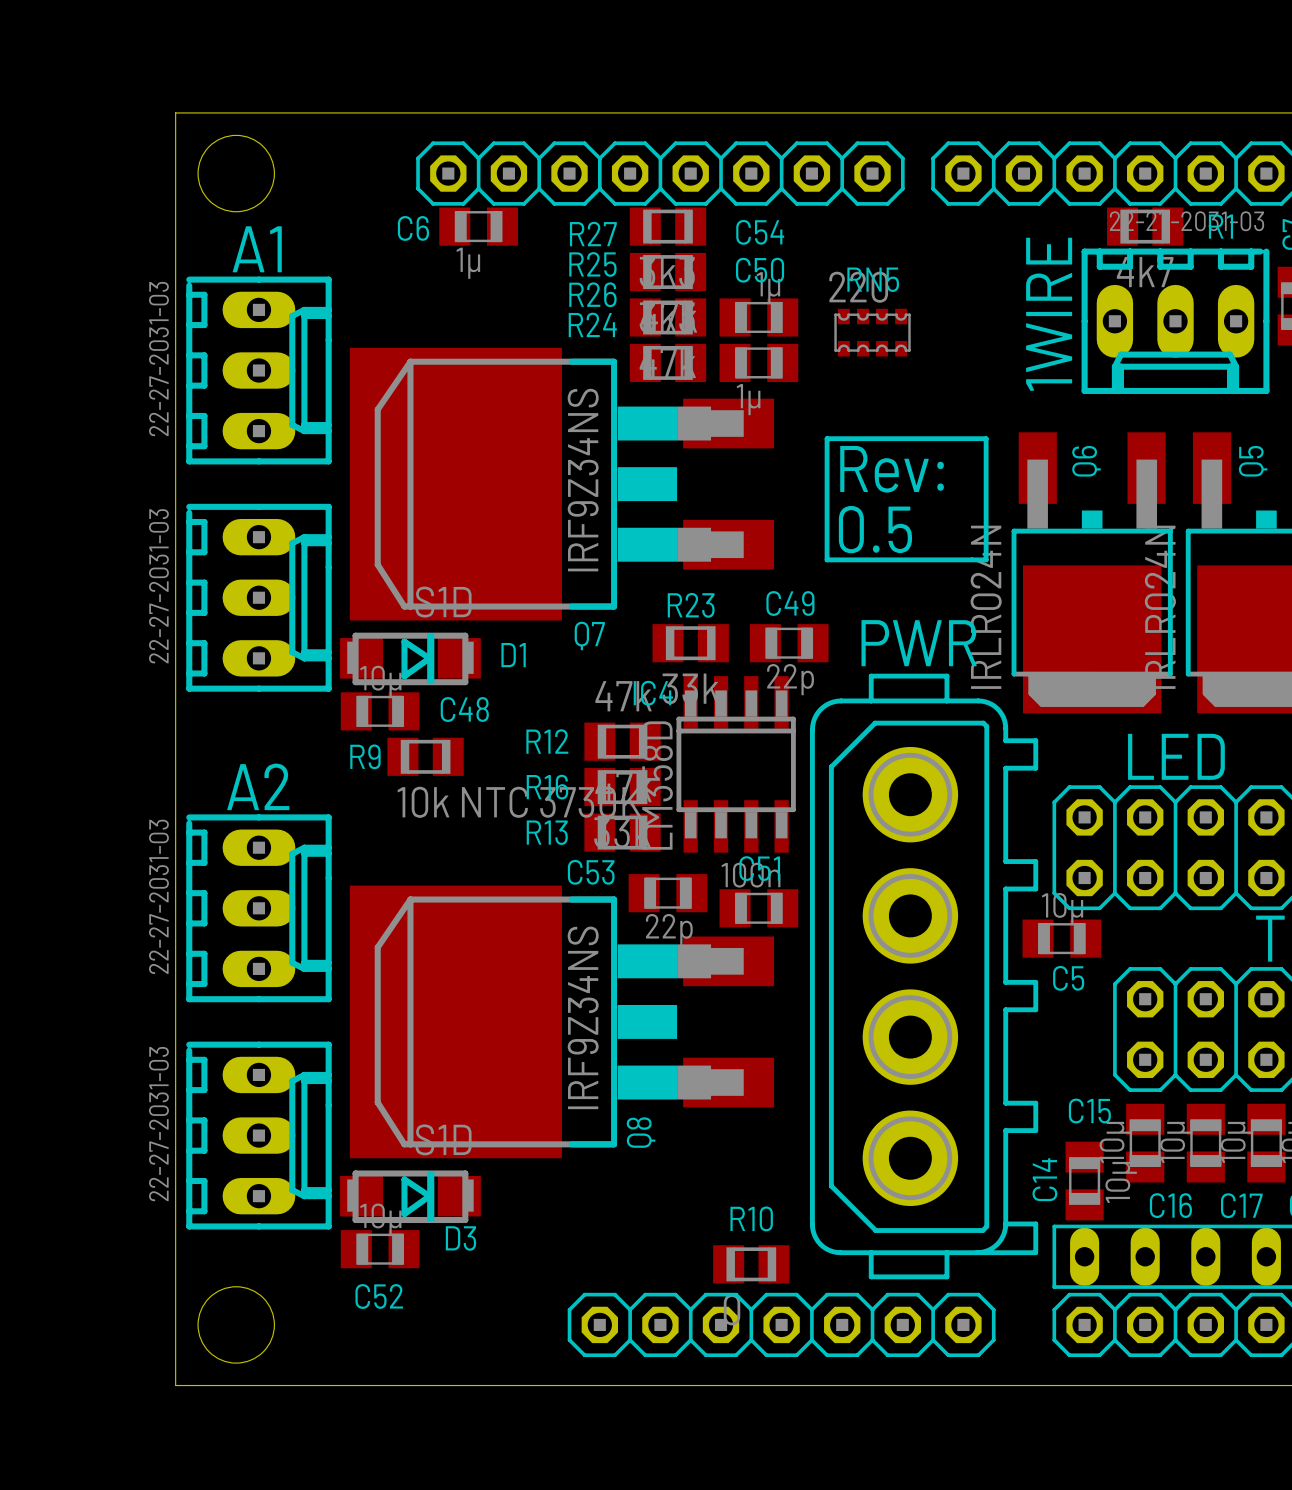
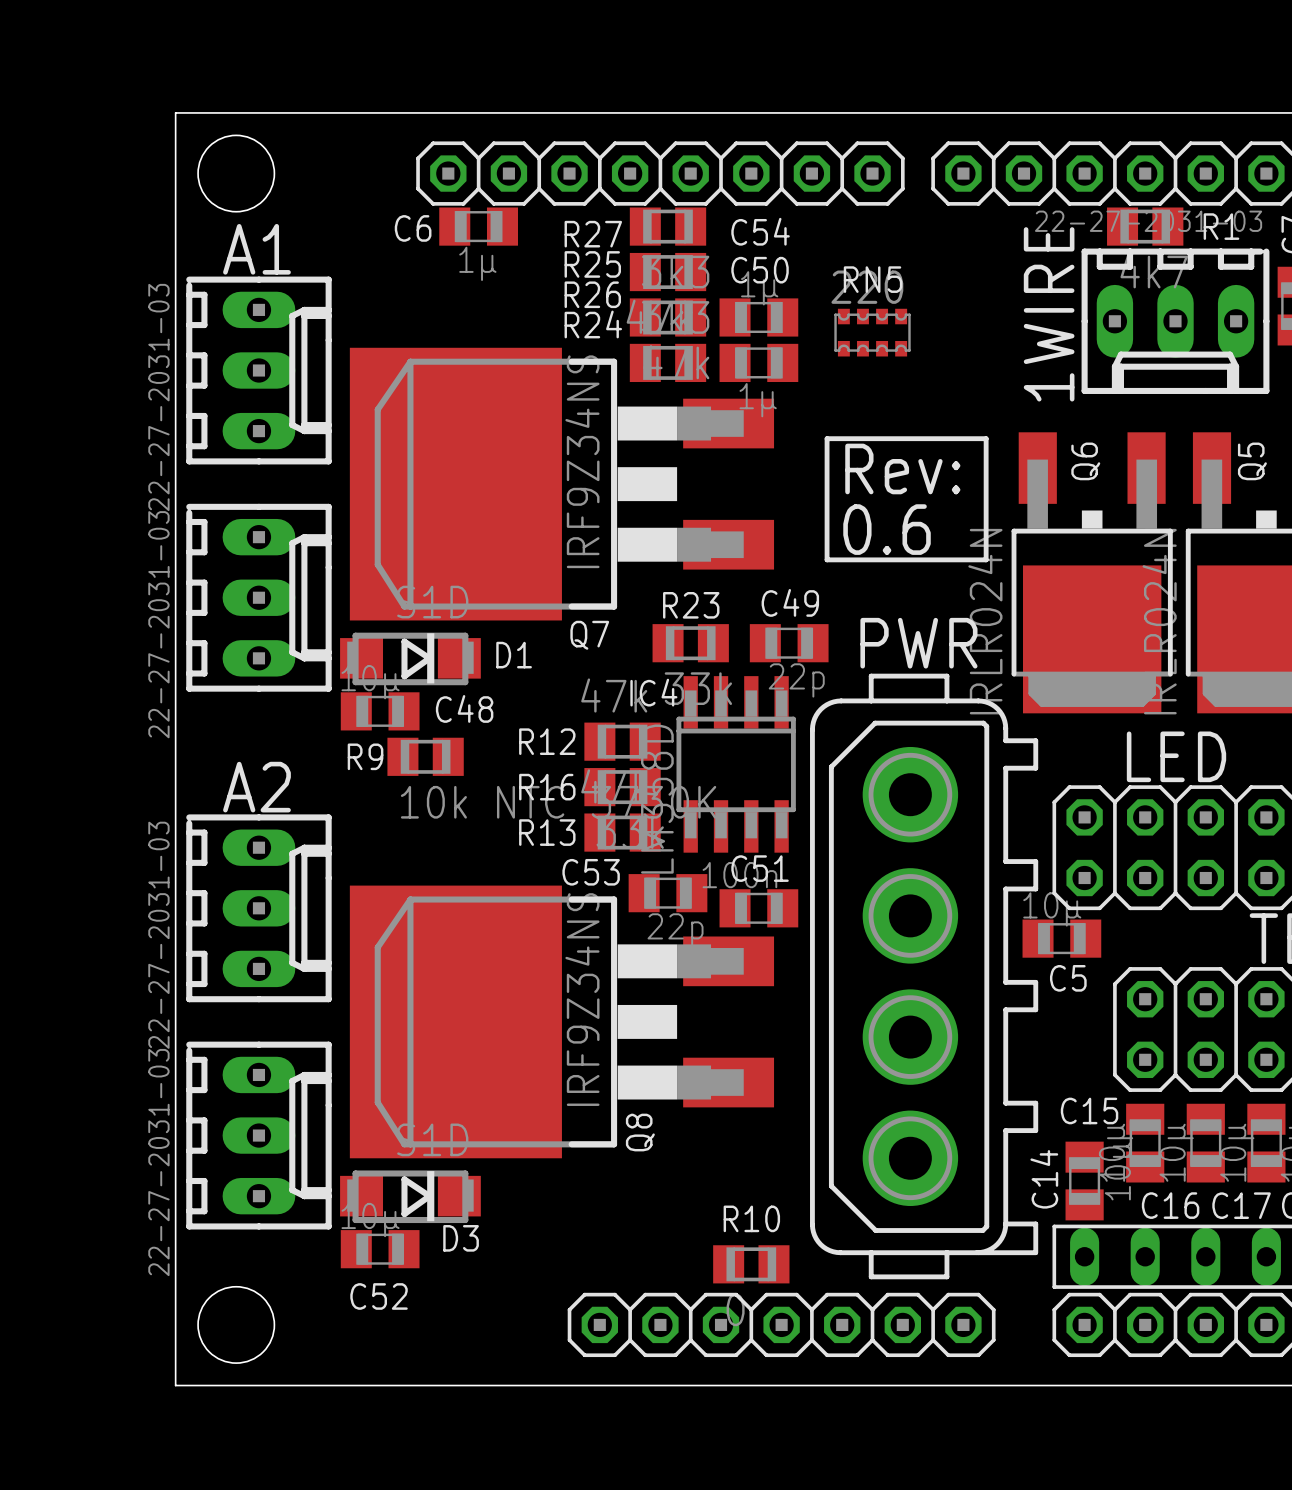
text: 0.5 (875, 529) -> 0.6 (887, 529)

